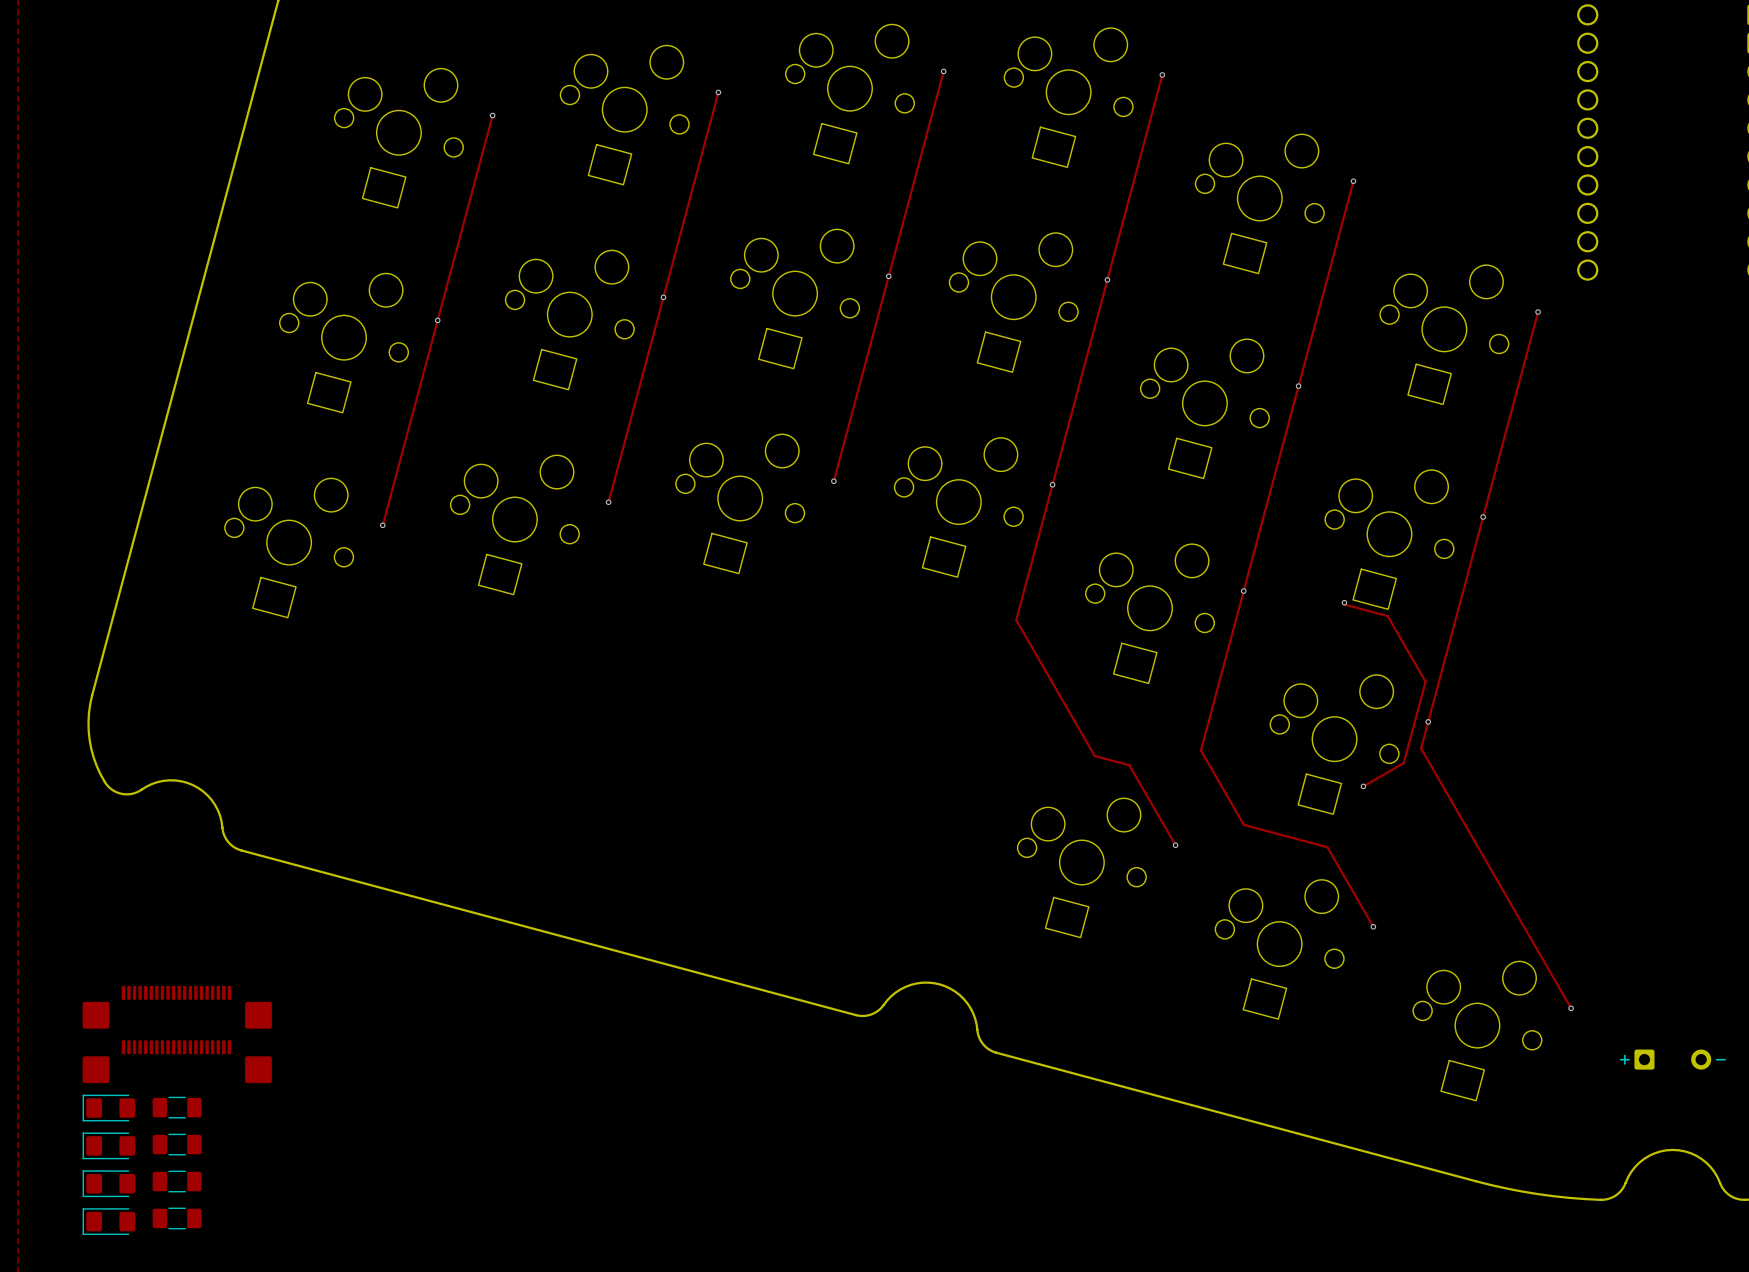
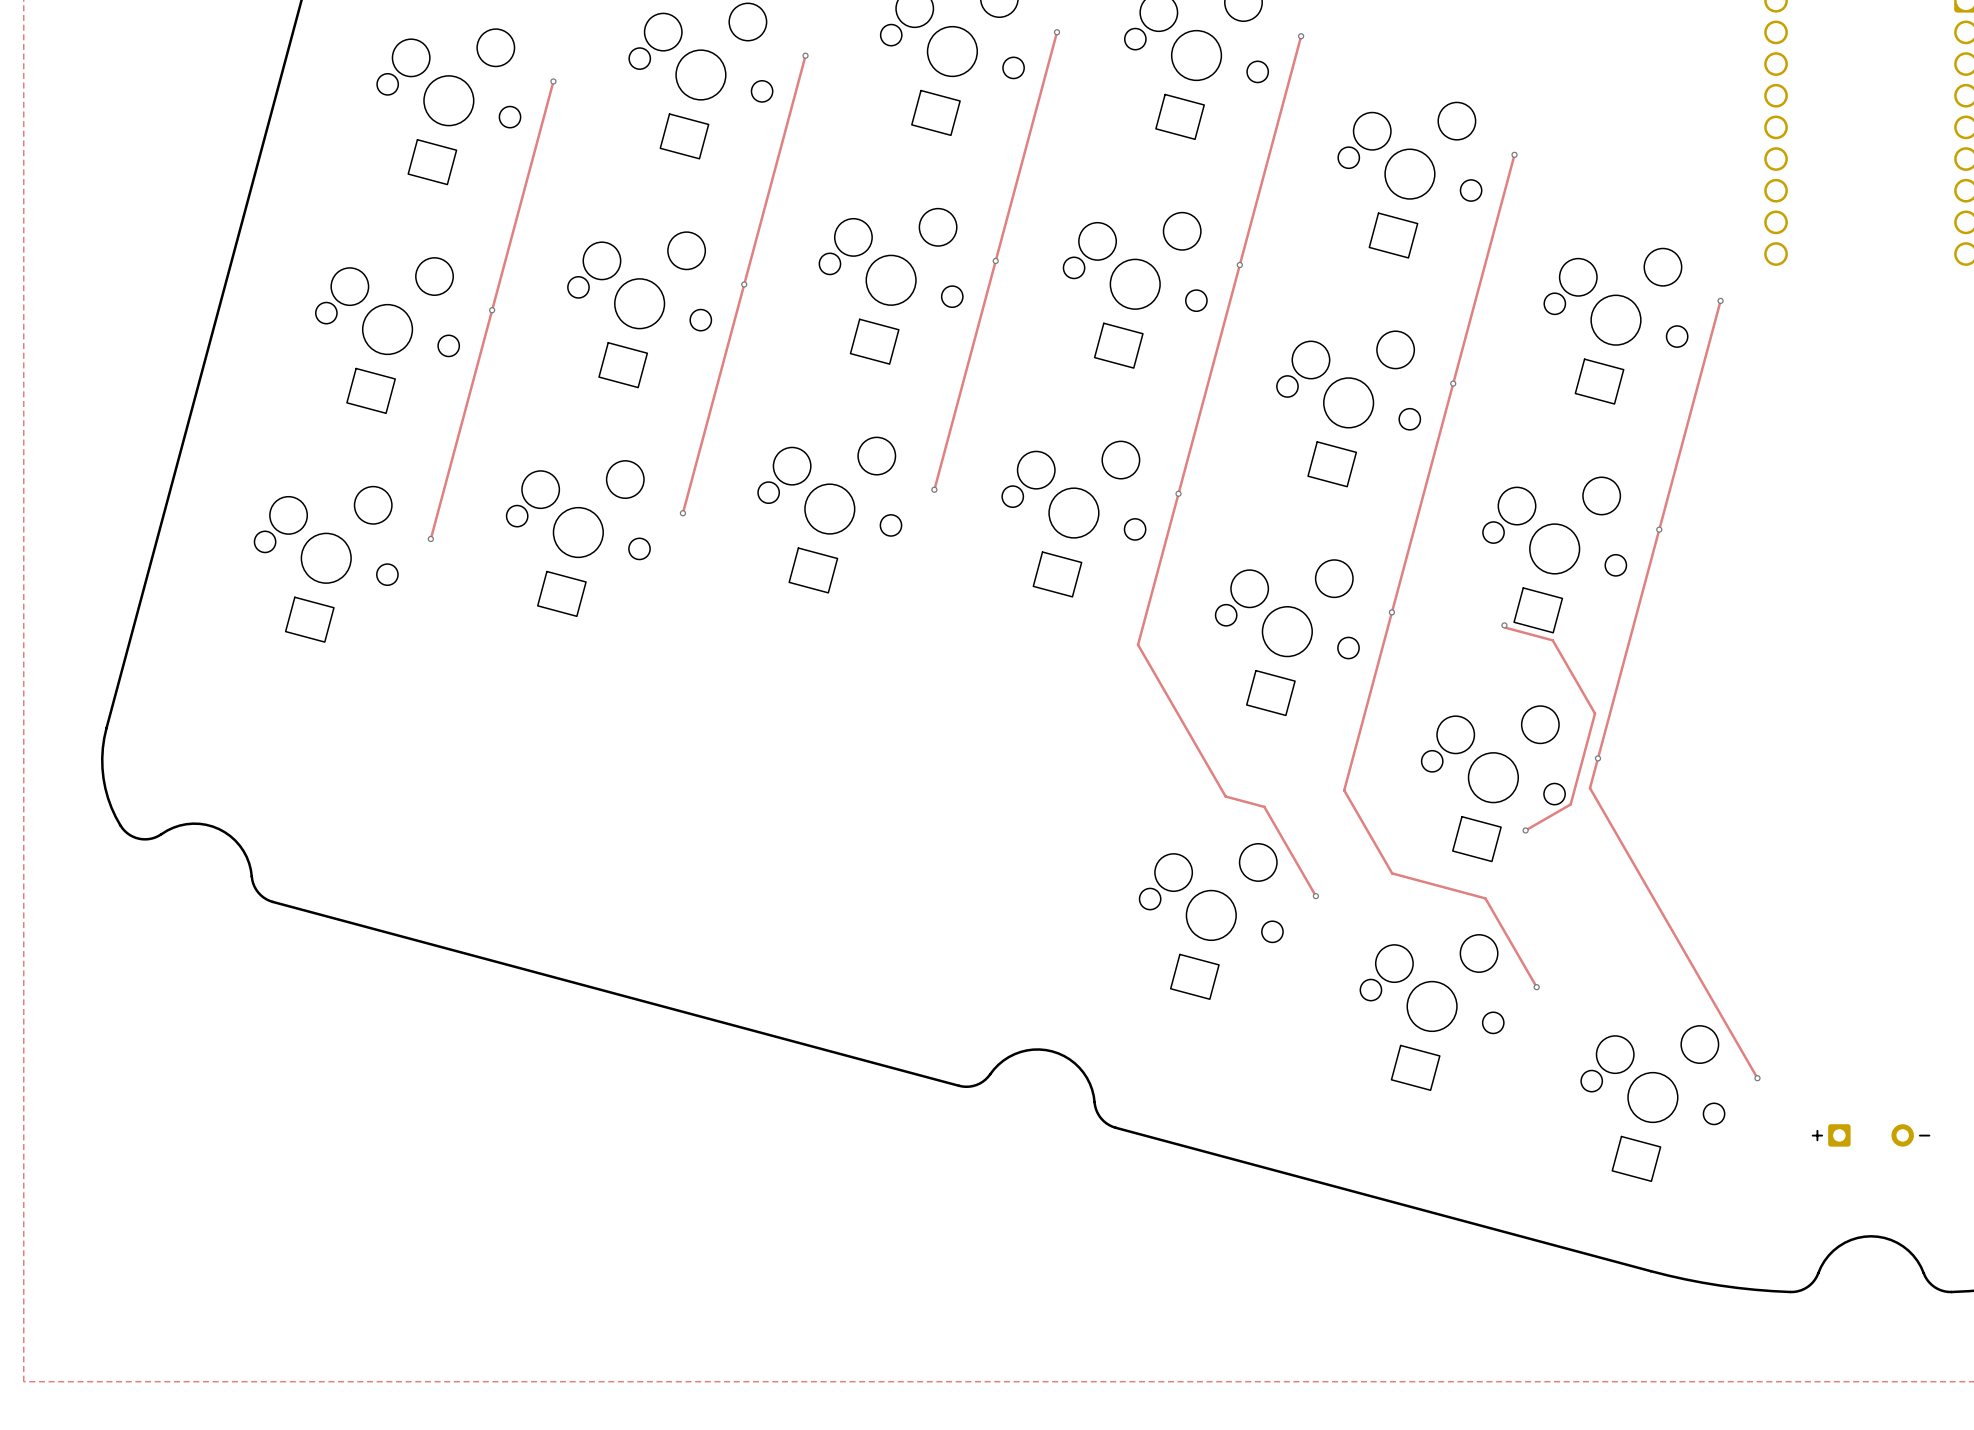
part: (177, 1007) -> none
part: (177, 1061) -> none
part: (177, 1107) -> none
part: (108, 1108) -> none
part: (177, 1144) -> none
part: (108, 1145) -> none
part: (177, 1181) -> none
part: (108, 1183) -> none
part: (177, 1218) -> none
part: (108, 1221) -> none

